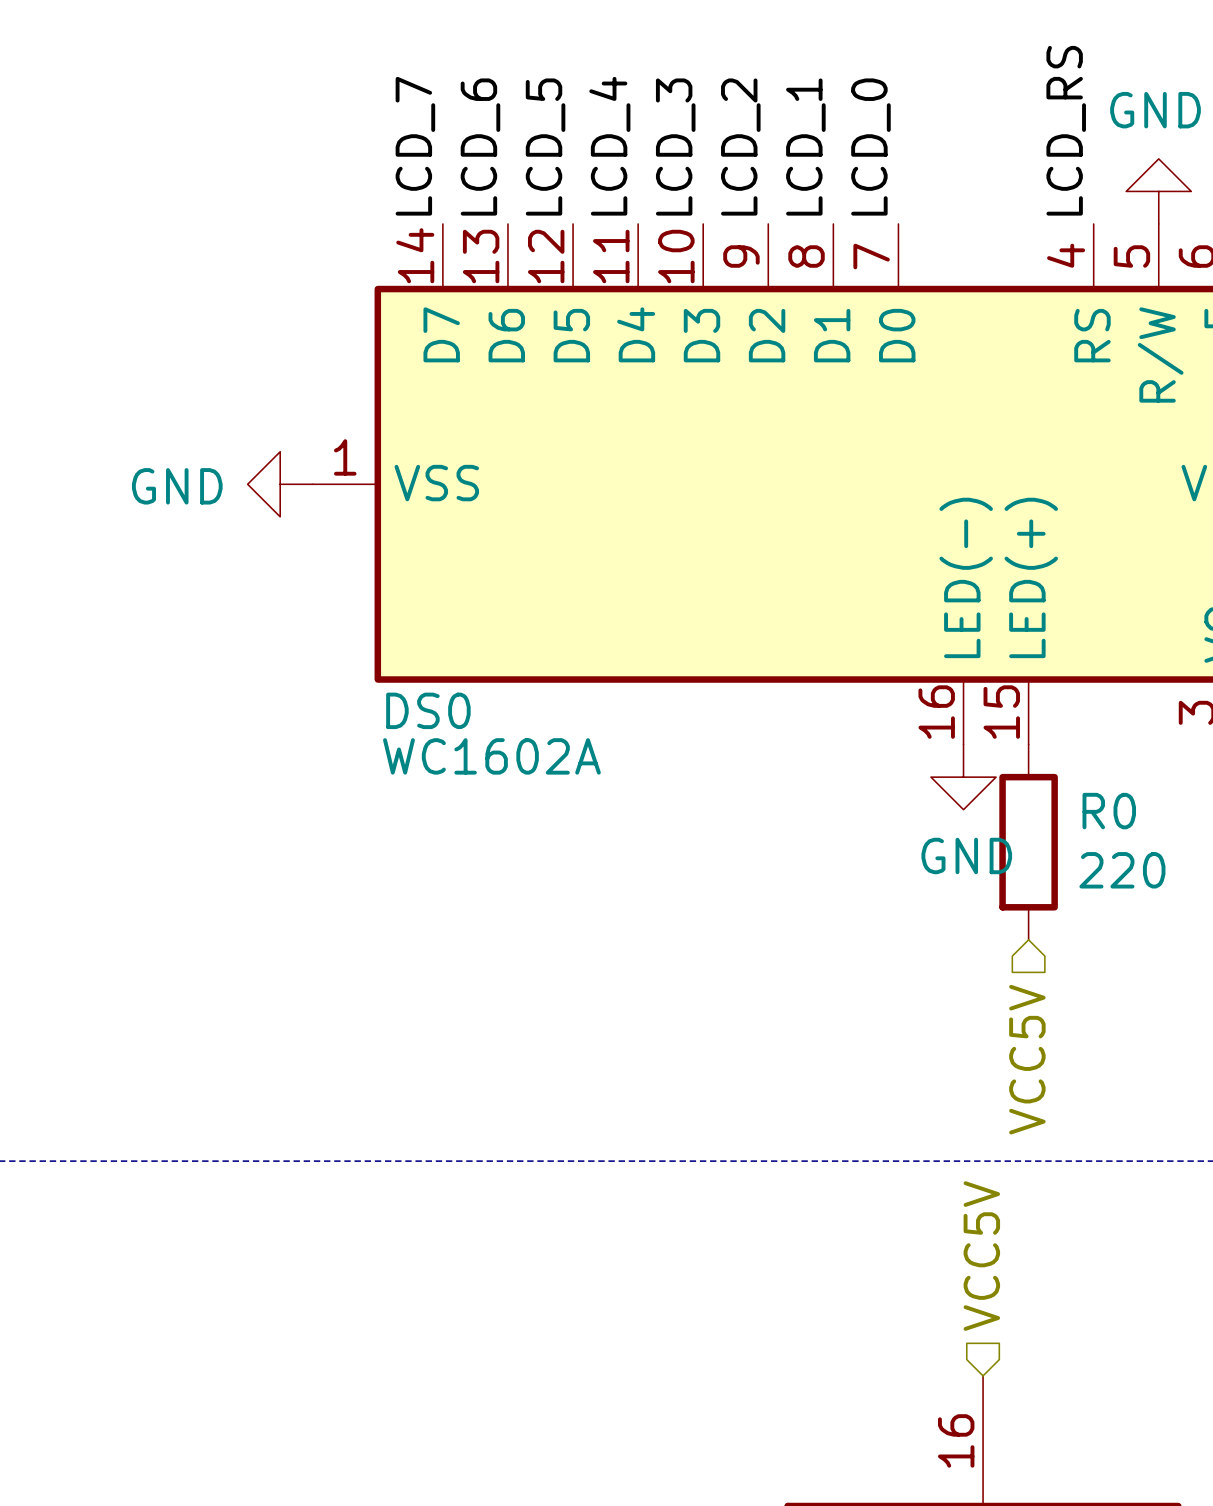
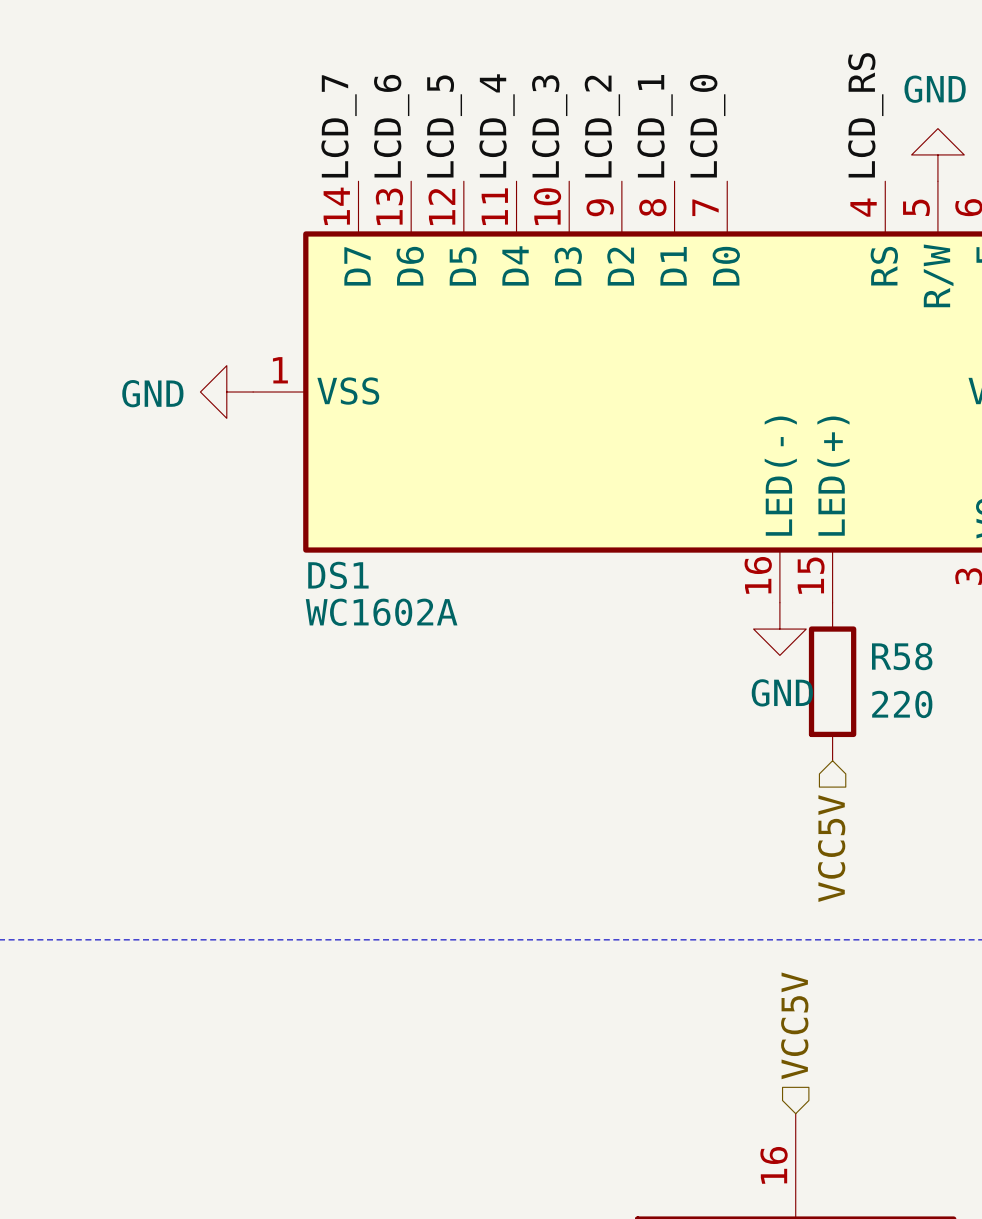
DS0 name: DS0 (428, 710) -> DS1 (338, 575)
R0 name: R0 (1109, 811) -> R58 (902, 656)

